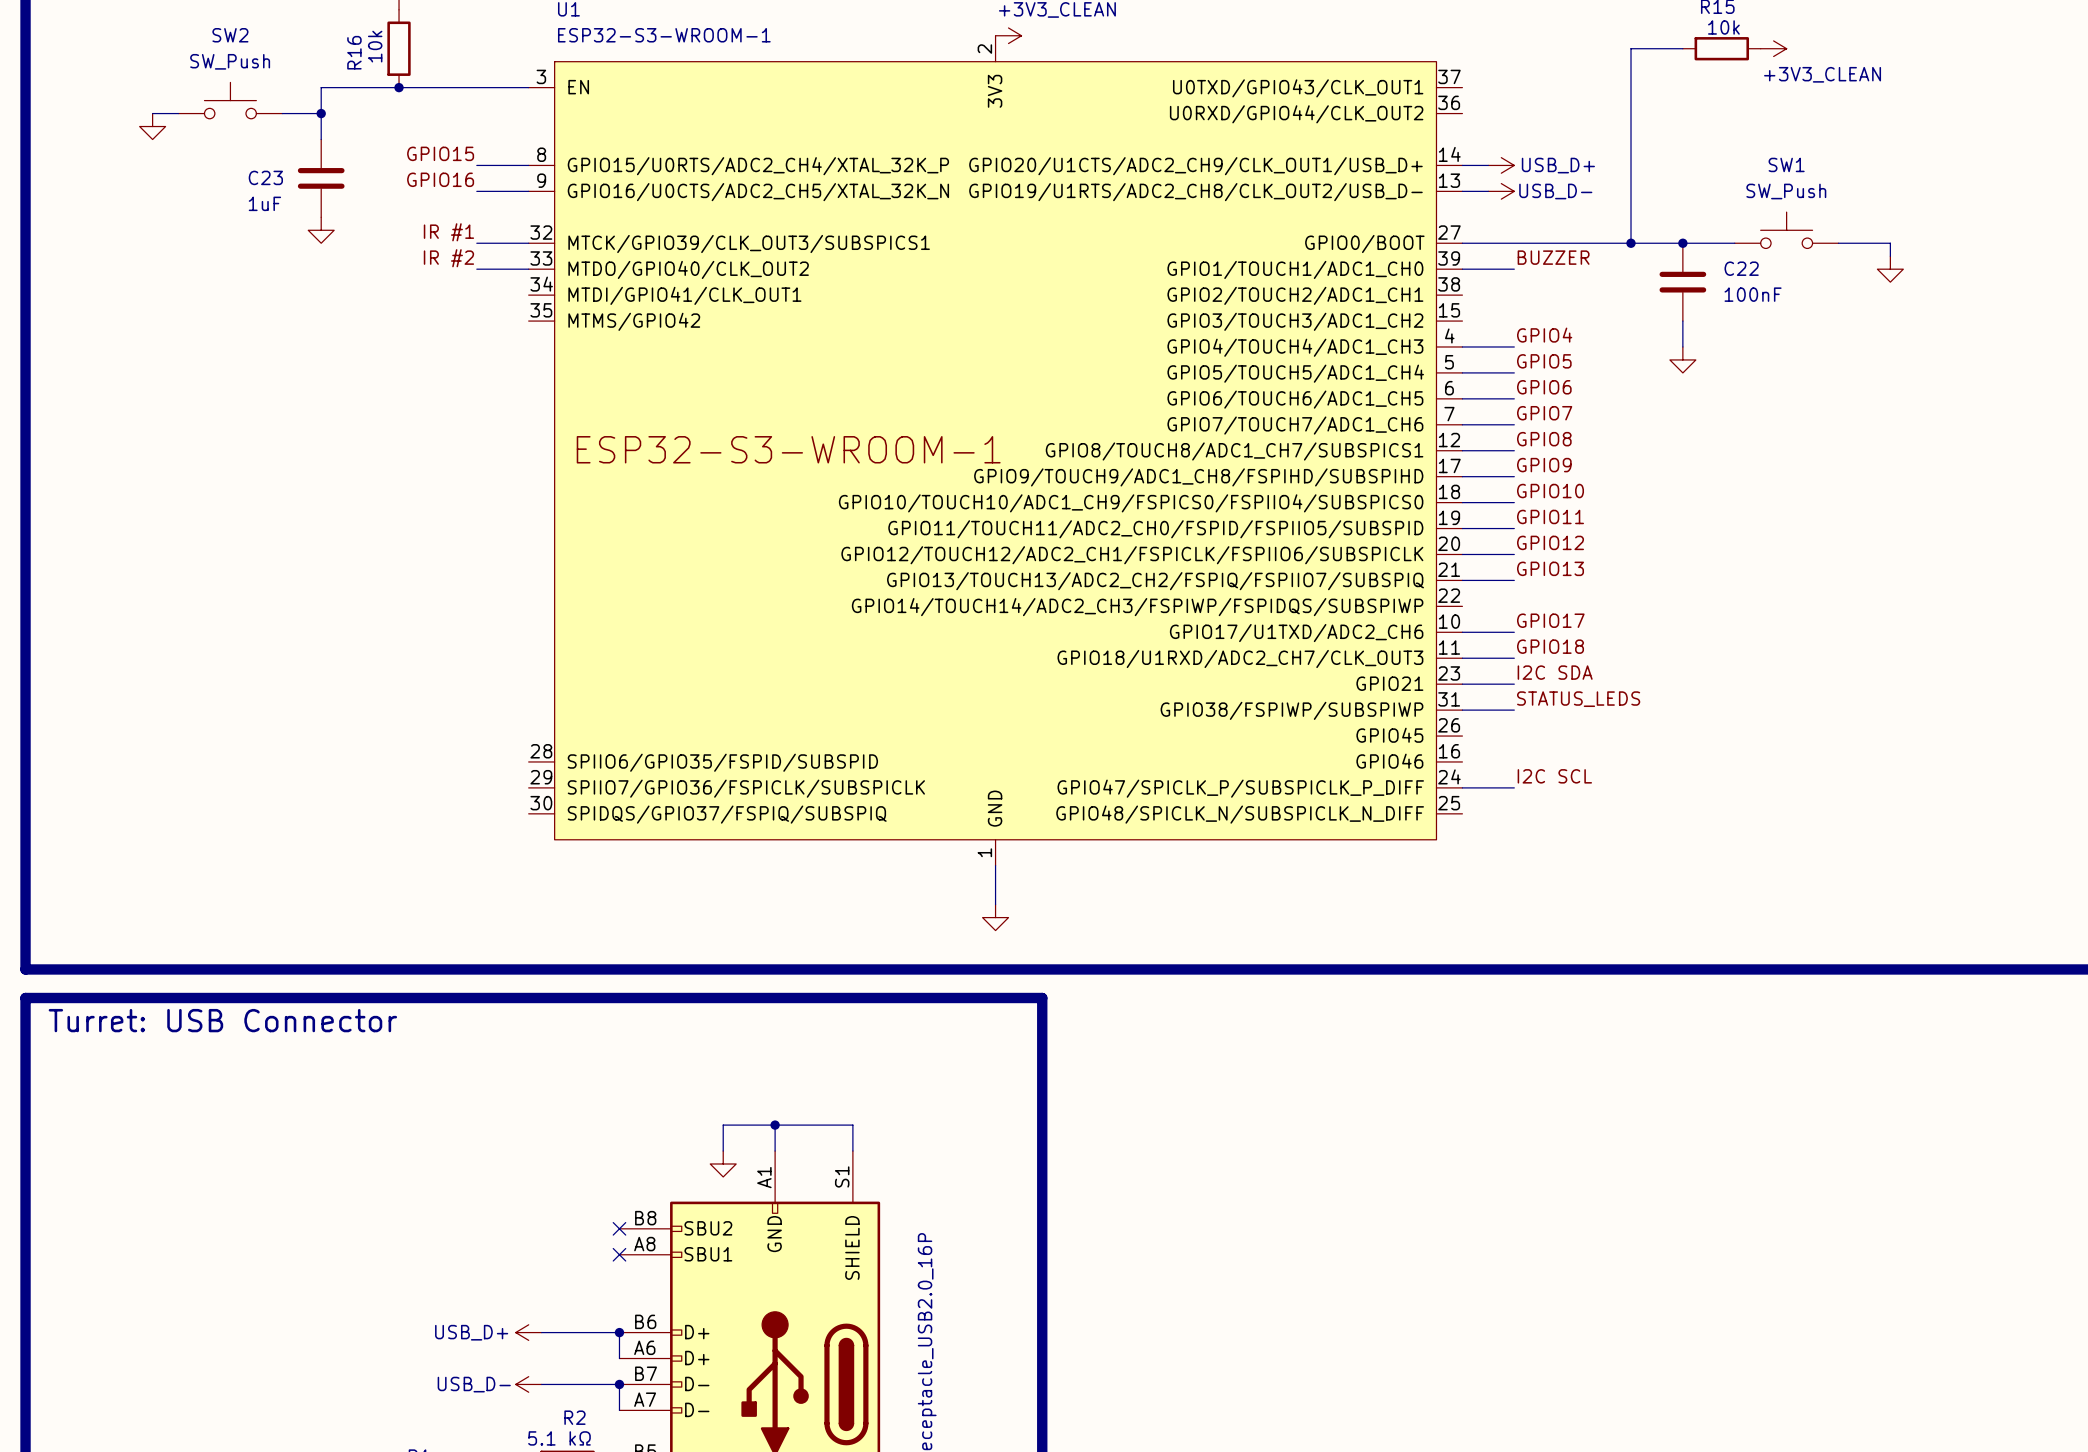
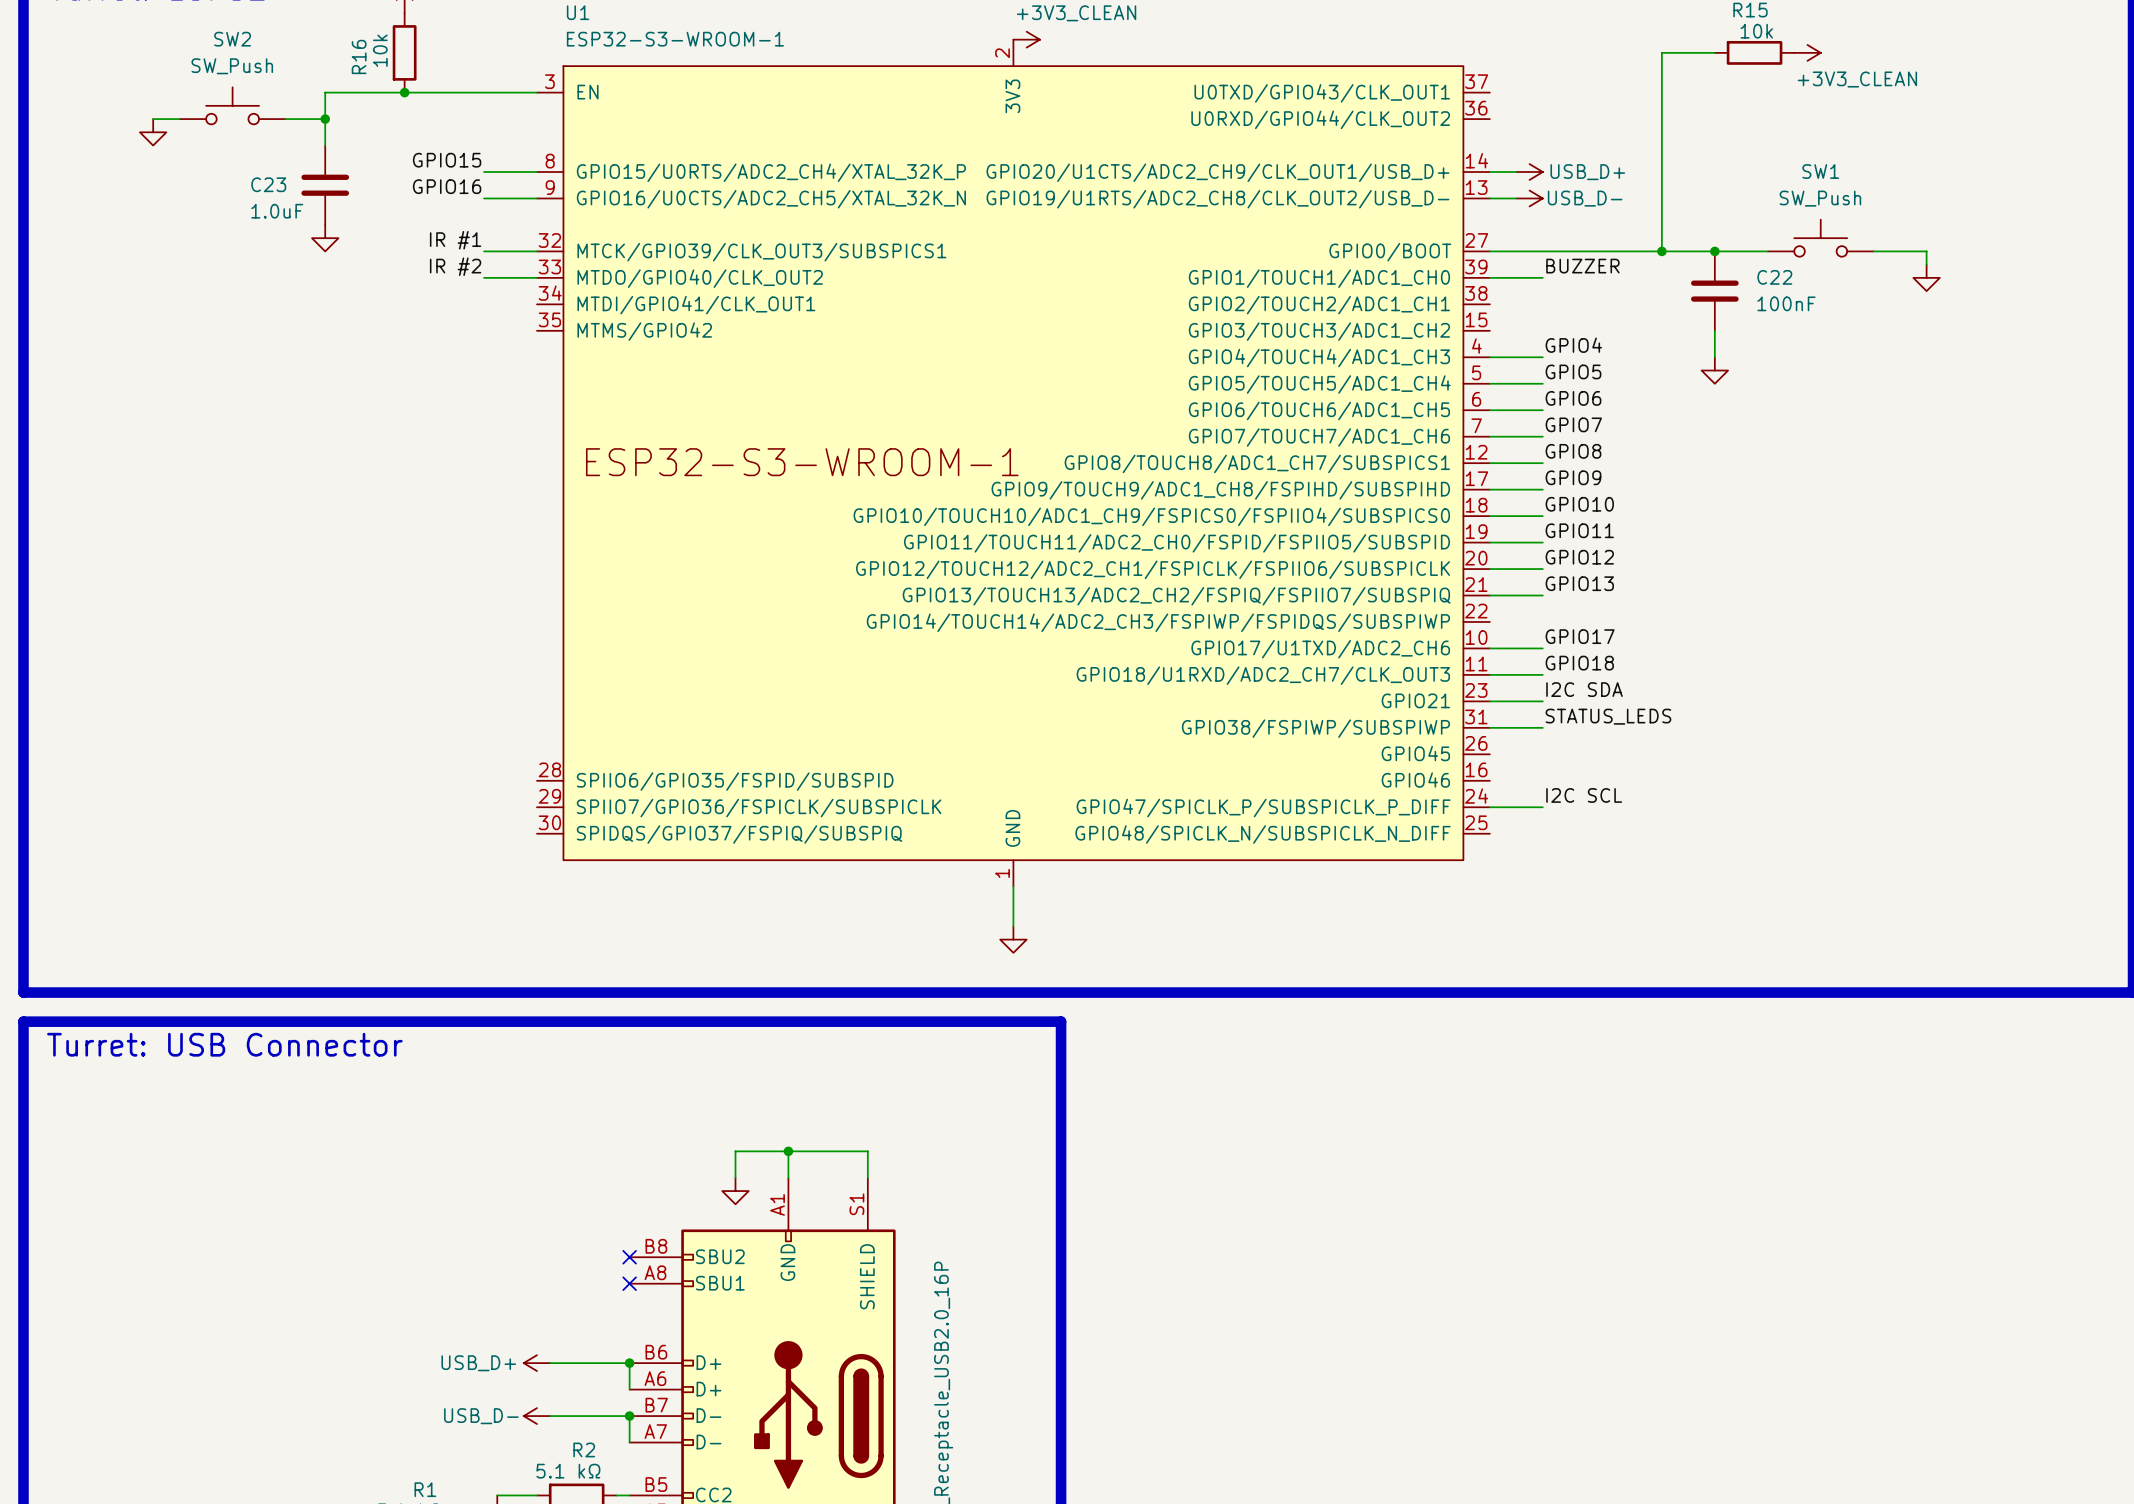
C23 value: 1uF (264, 203) -> 1.0uF (277, 211)

